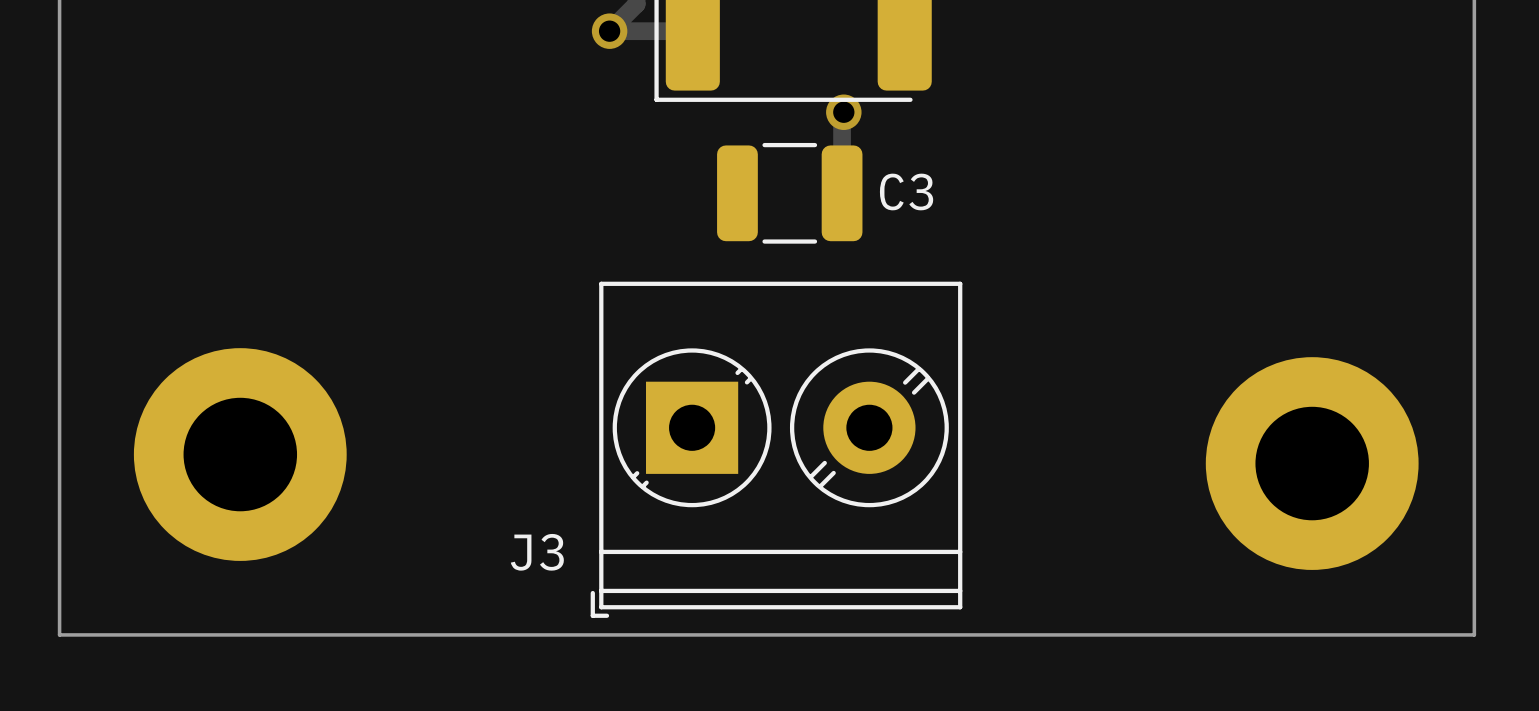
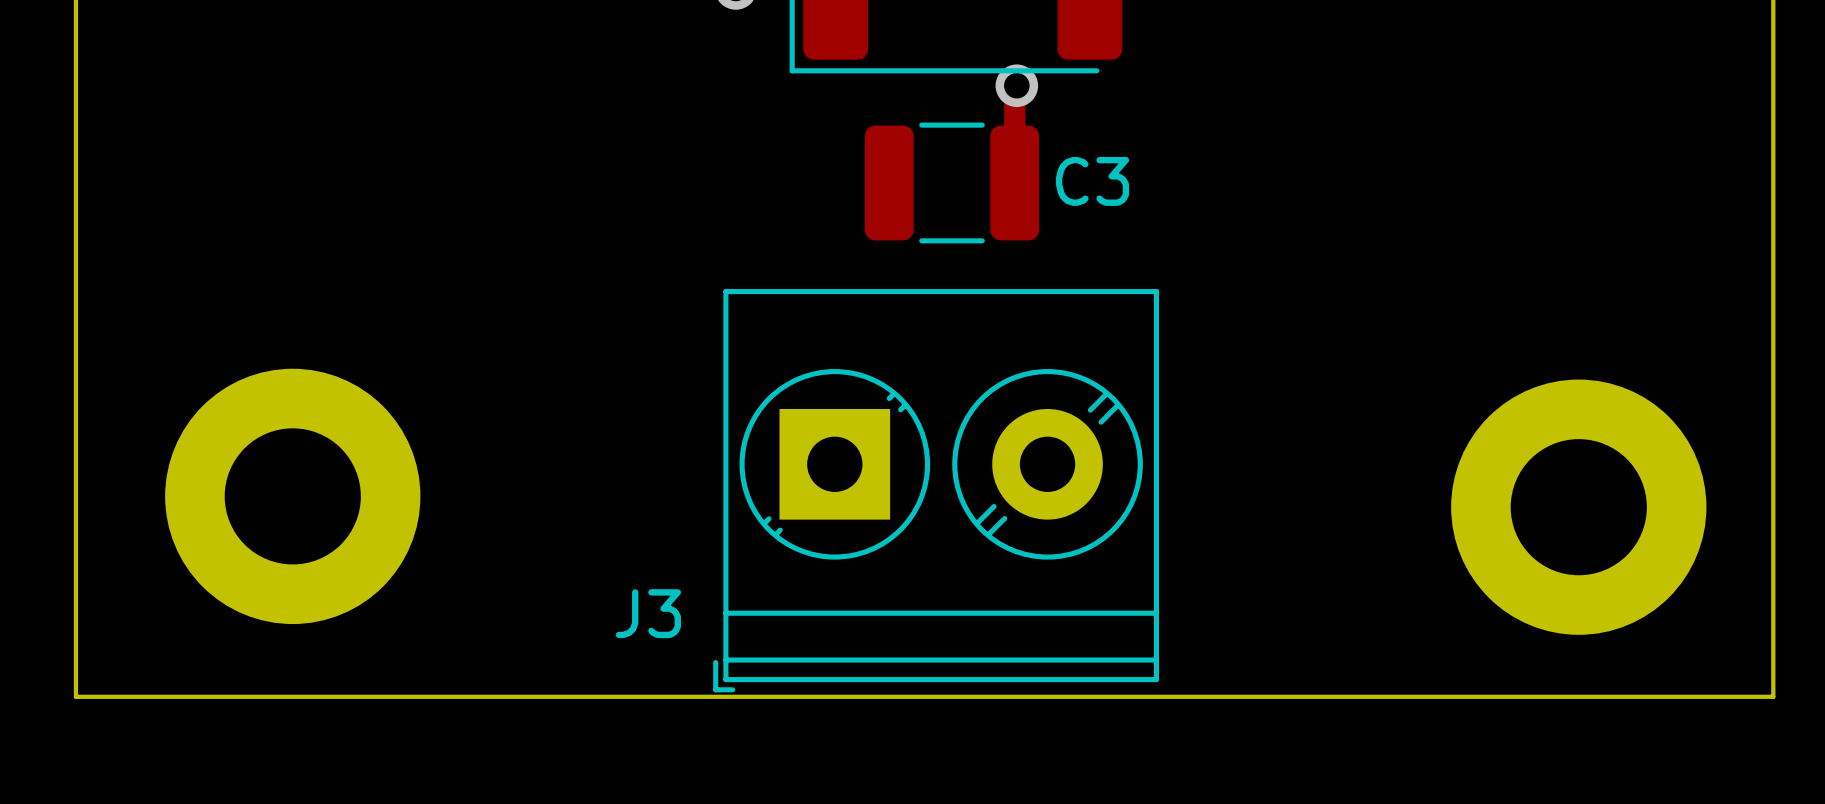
board edge: (59, 621) (59, 634) (1474, 634) (1474, 621) -> (75, 696) (1773, 696)

